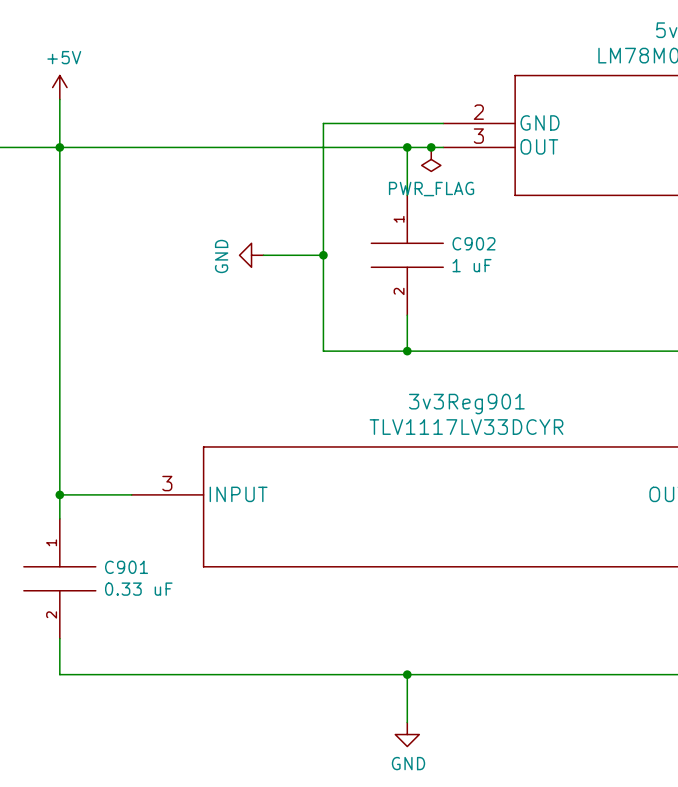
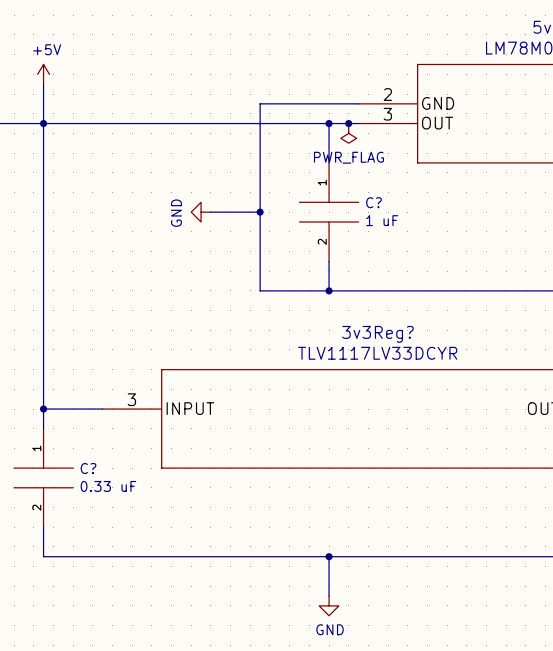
C902 name: C902 (474, 243) -> C? (374, 202)
3v3Reg901 name: 3v3Reg901 (466, 404) -> 3v3Reg? (377, 334)
C901 name: C901 (126, 567) -> C? (88, 468)

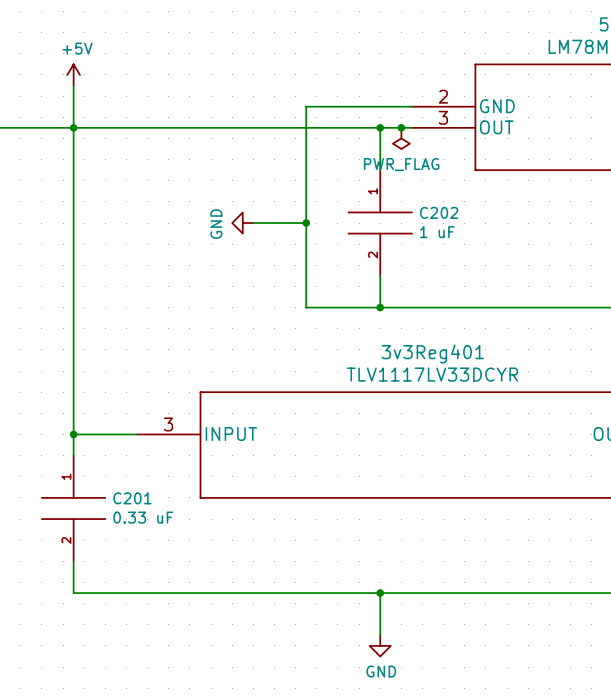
C? name: C? (374, 202) -> C202 (439, 212)
3v3Reg? name: 3v3Reg? (377, 334) -> 3v3Reg401 (432, 353)
C? name: C? (88, 468) -> C201 (132, 498)

